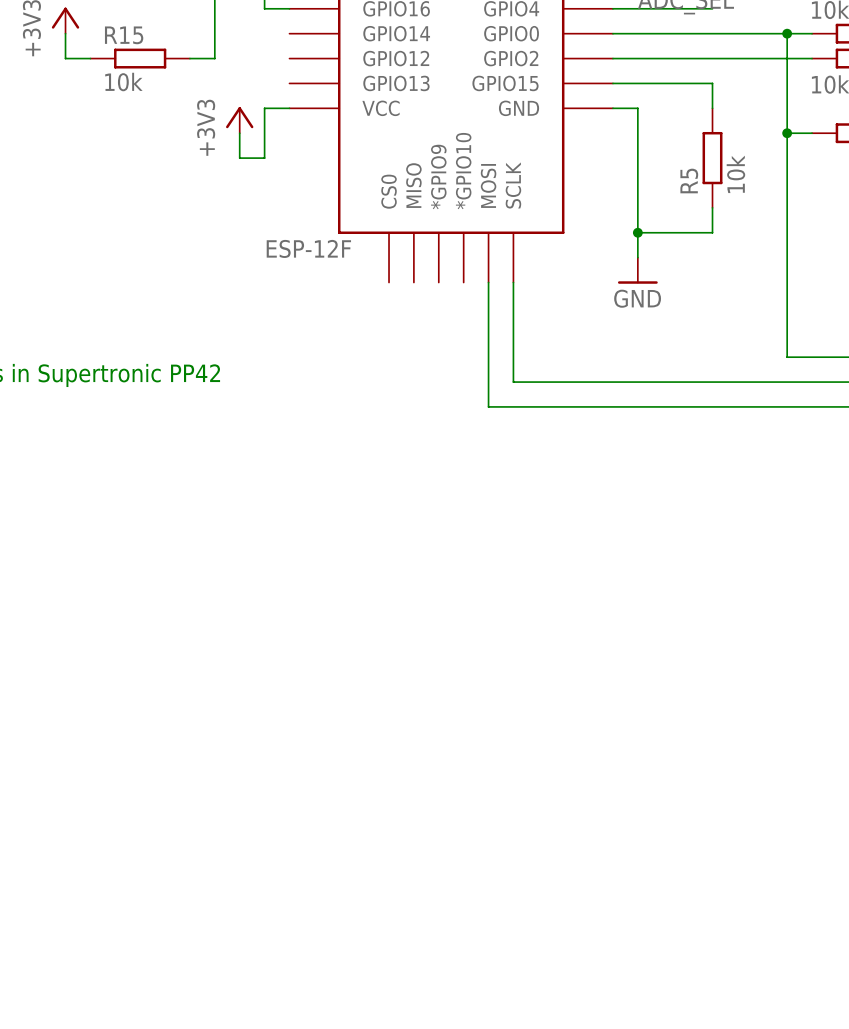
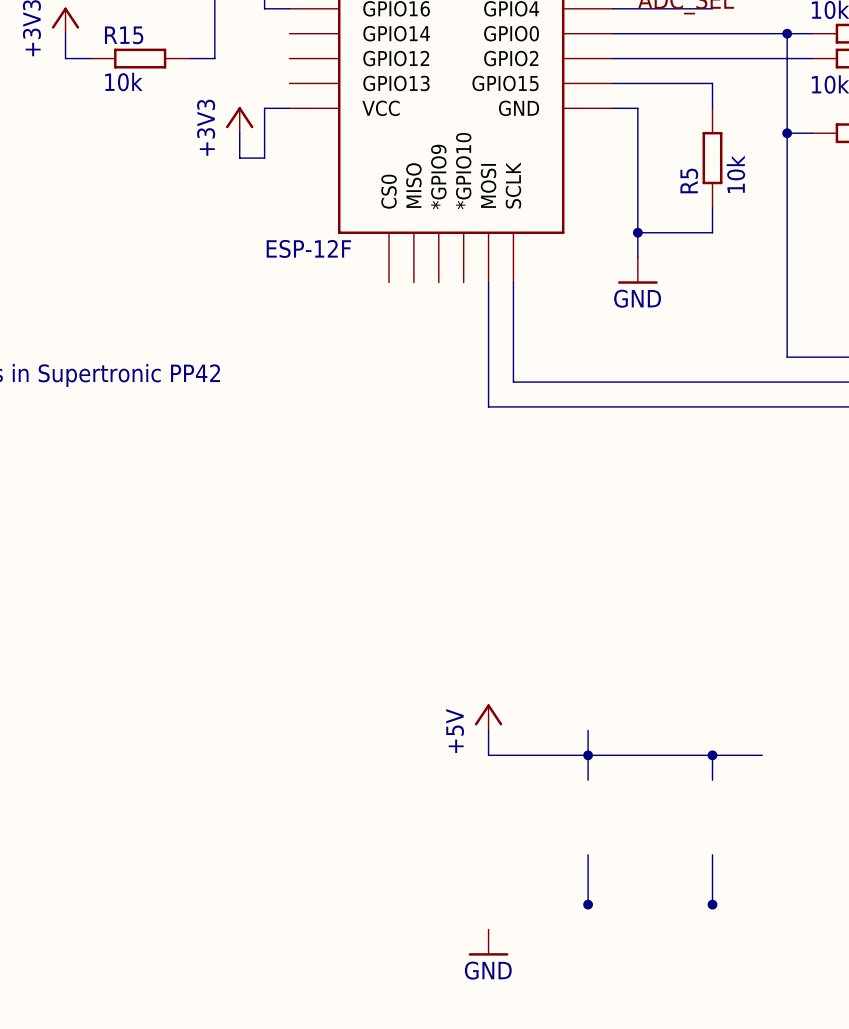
power symbol: none -> +5V (488, 717)
wire: none -> (488, 730) (488, 755) (762, 755)
wire: none -> (588, 730) (588, 780)
junction: none -> (588, 755)
wire: none -> (712, 755) (712, 780)
junction: none -> (712, 755)
wire: none -> (588, 854) (588, 904)
wire: none -> (712, 854) (712, 904)
junction: none -> (588, 904)
junction: none -> (712, 904)
power symbol: none -> GND (488, 942)

